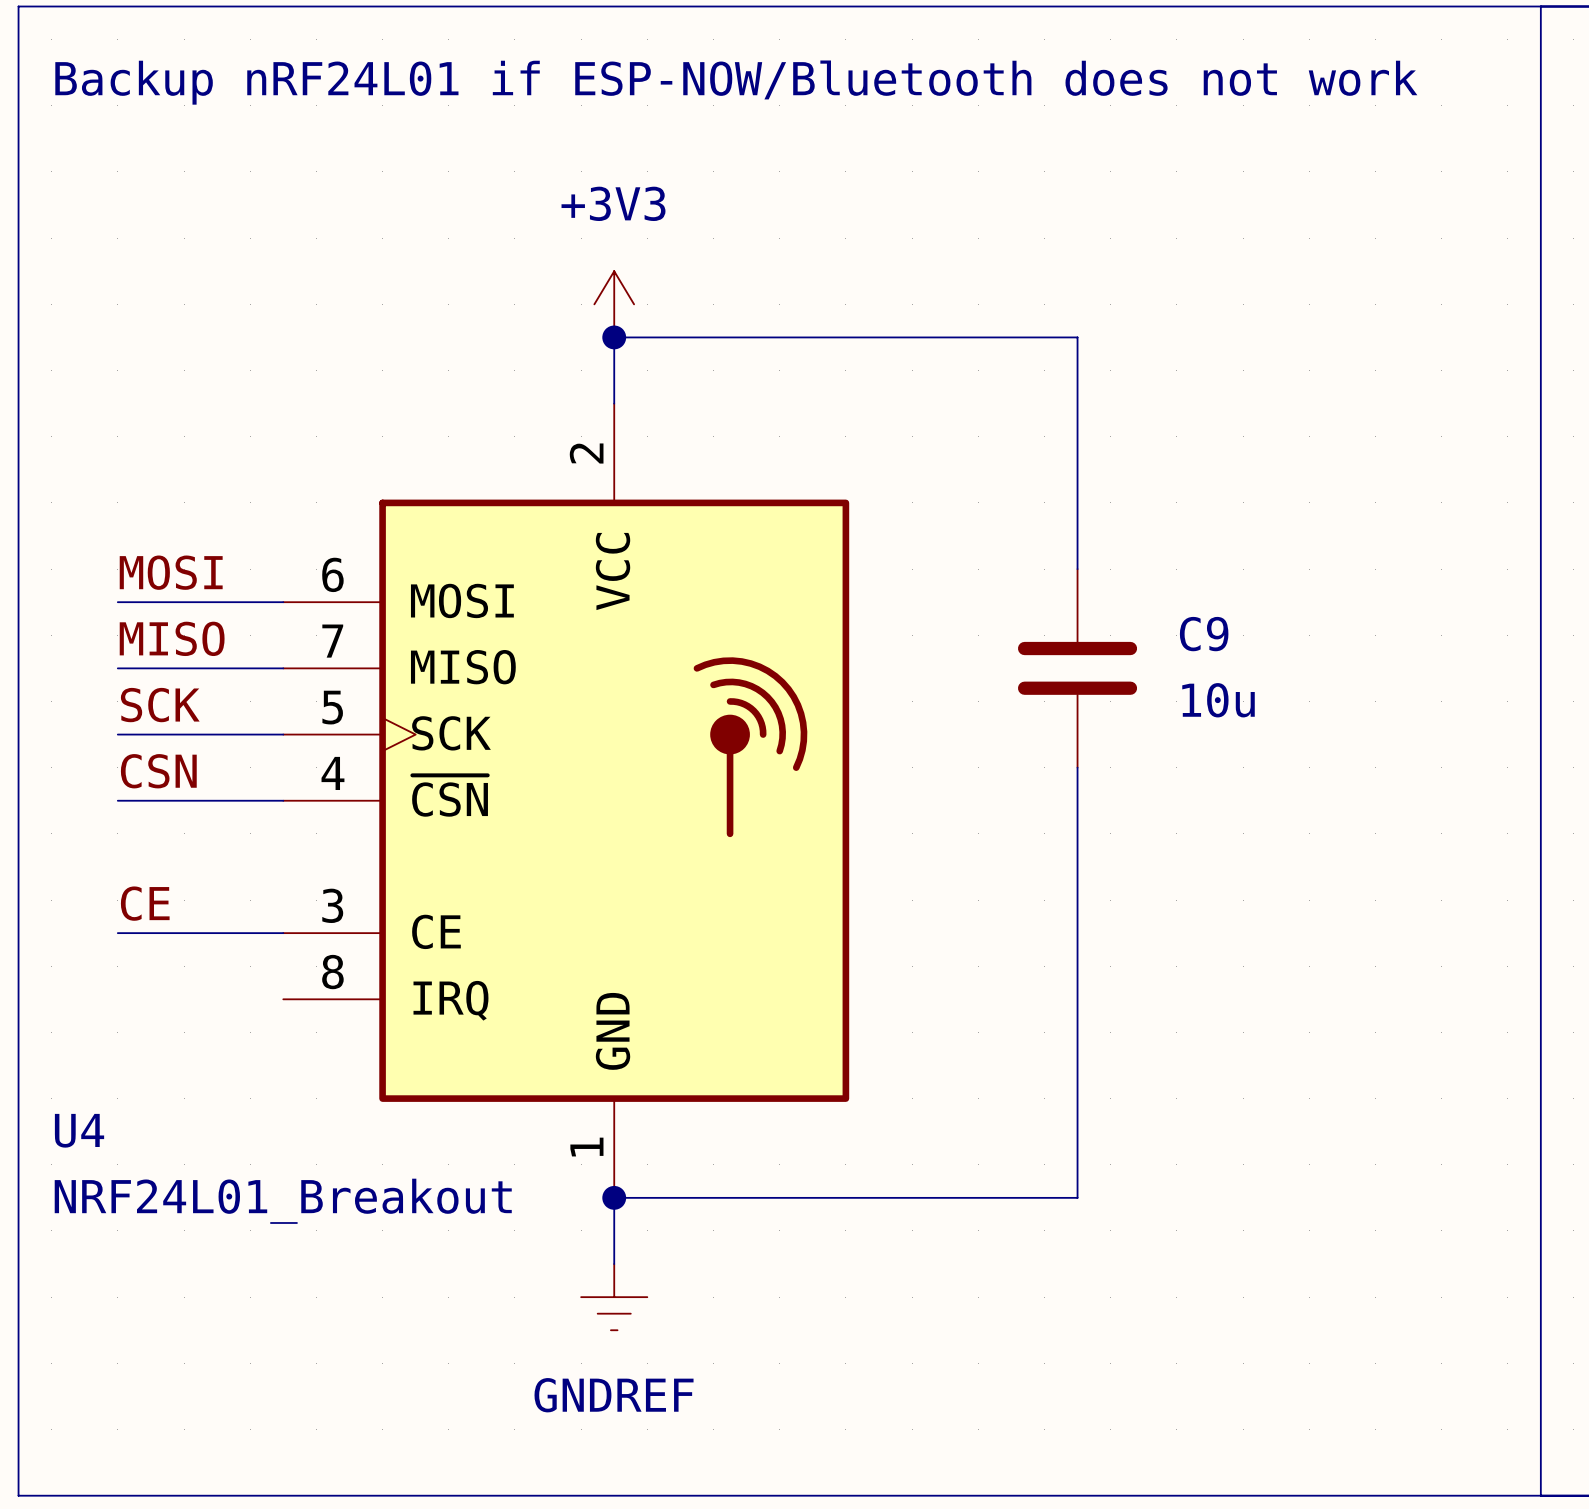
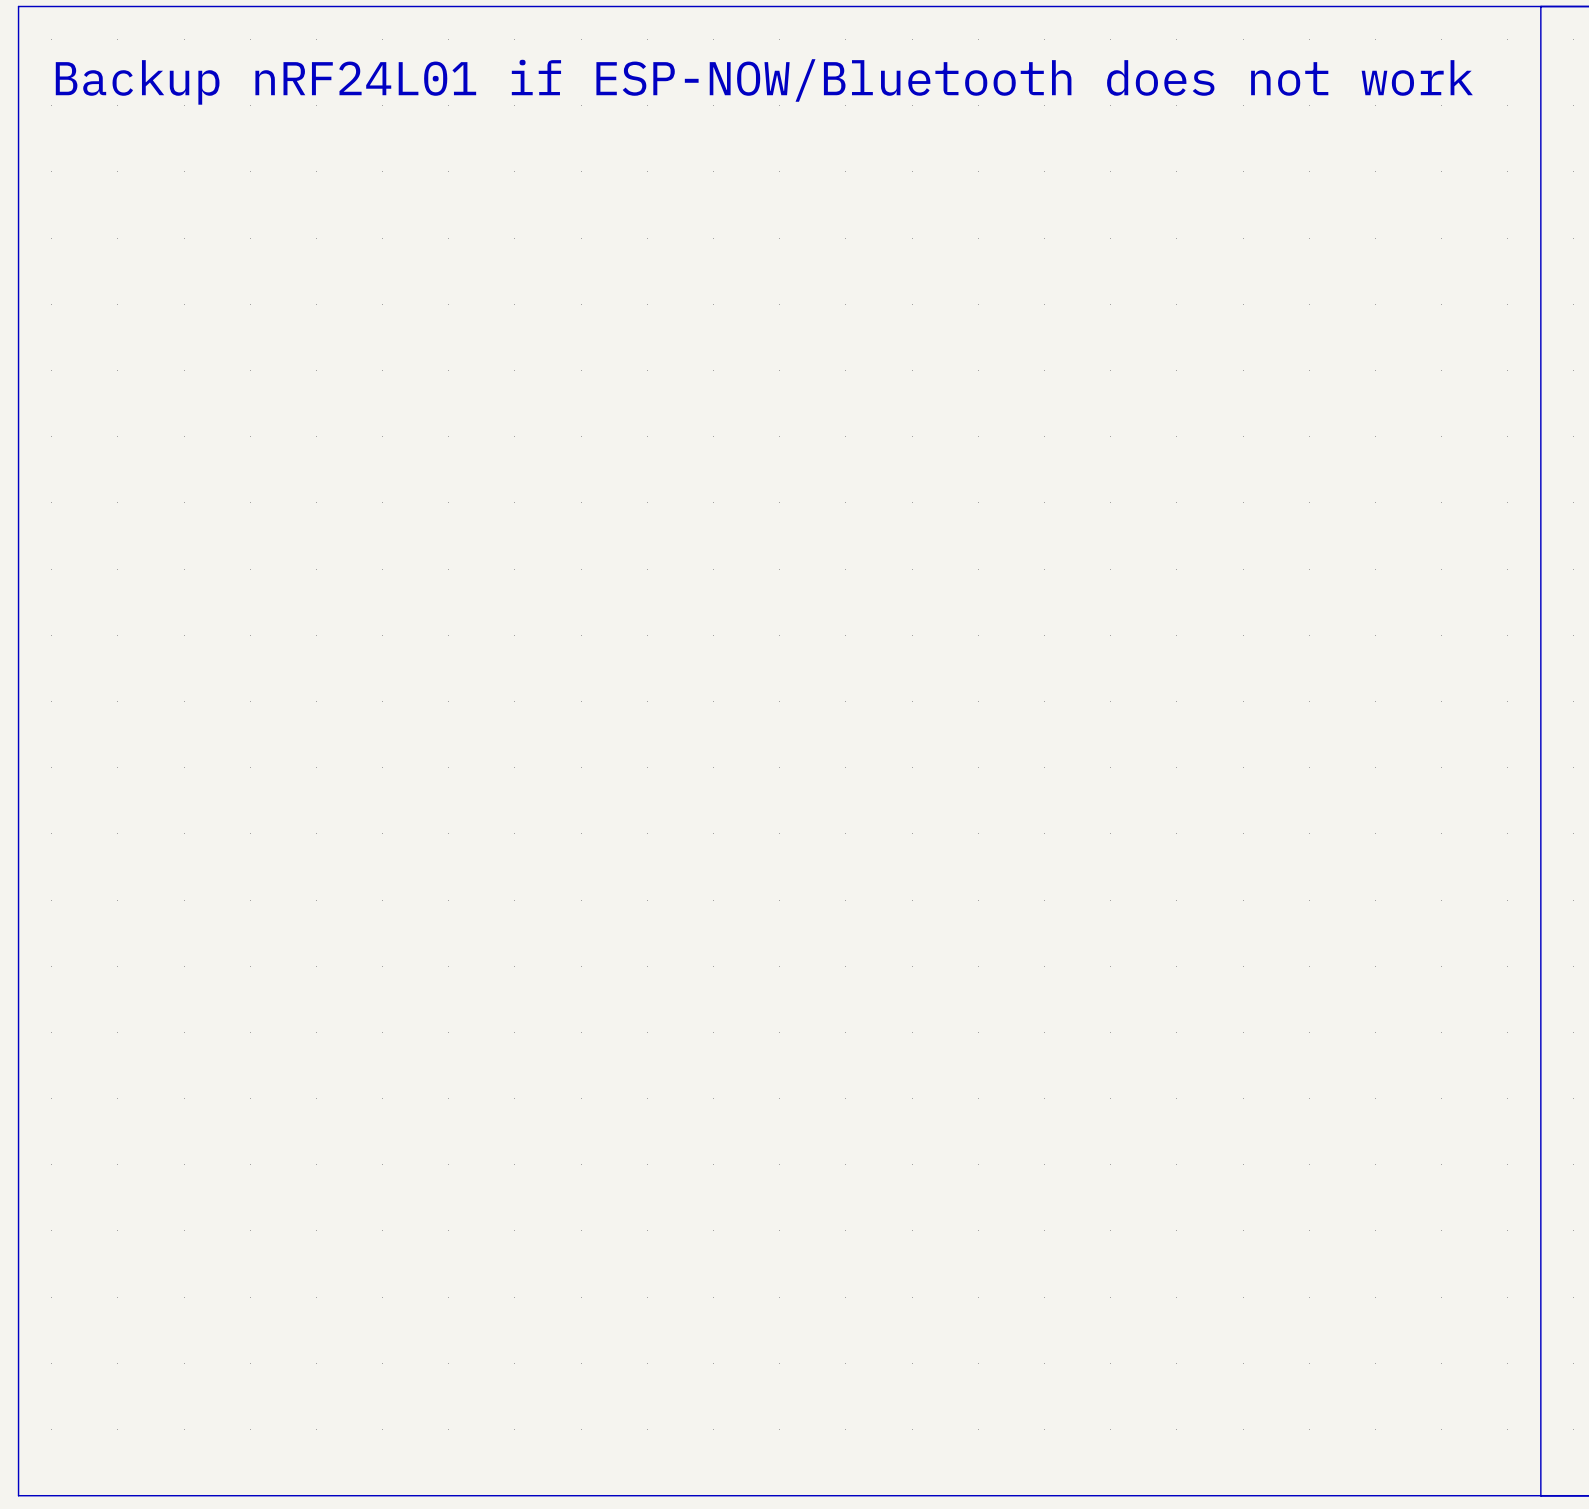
power symbol: +3V3 (614, 304) -> none
junction: (614, 337) -> none
wire: (614, 403) (614, 337) (1077, 337) (1077, 569) -> none
label: MOSI (171, 572) -> none
wire: (117, 602) (283, 602) -> none
label: MISO (172, 638) -> none
wire: (117, 668) (283, 668) -> none
C9: 10u (1077, 668) -> none
label: SCK (160, 705) -> none
wire: (117, 734) (283, 734) -> none
wire: (1077, 767) (1077, 1197) (614, 1197) (614, 1264) -> none
label: CSN (158, 771) -> none
wire: (117, 800) (283, 800) -> none
U4: NRF24L01_Breakout (566, 800) -> none
label: CE (145, 903) -> none
wire: (117, 933) (283, 933) -> none
junction: (614, 1197) -> none
power symbol: GNDREF (614, 1297) -> none

